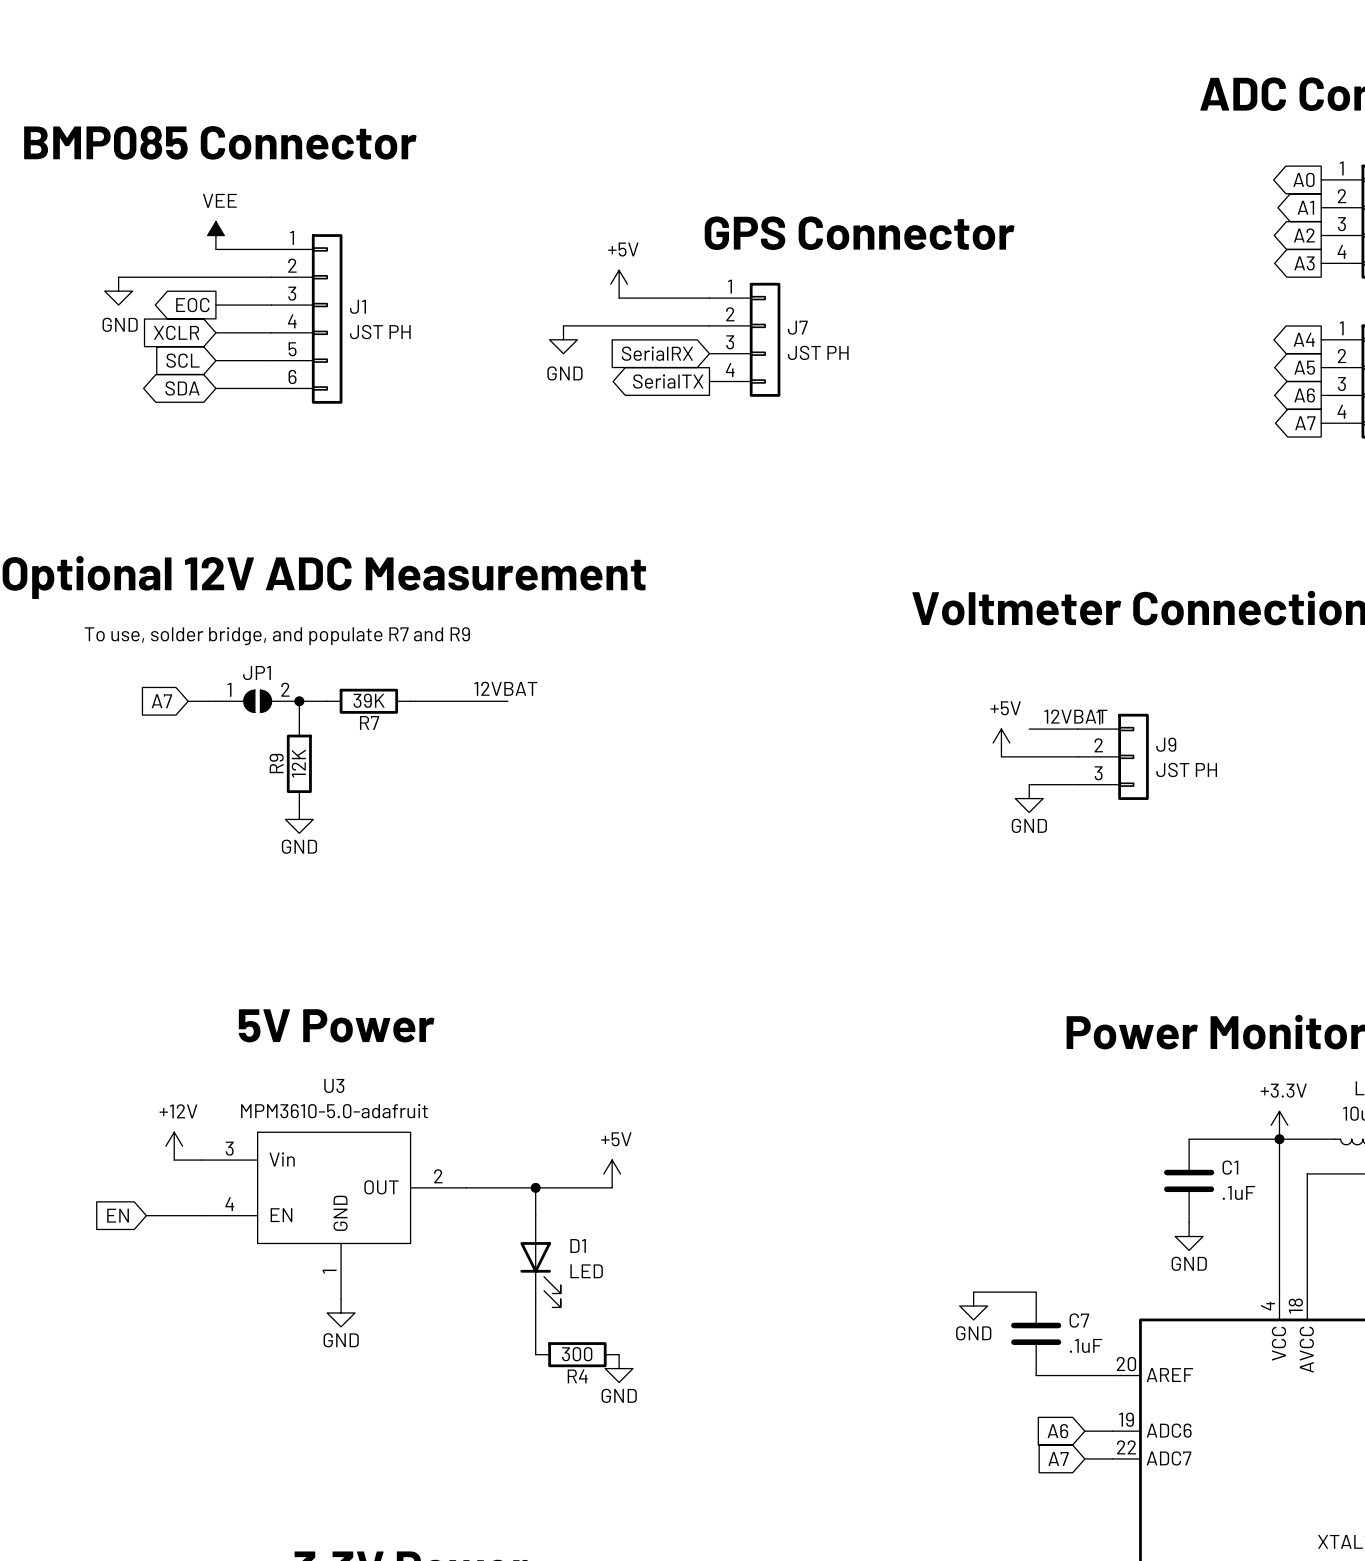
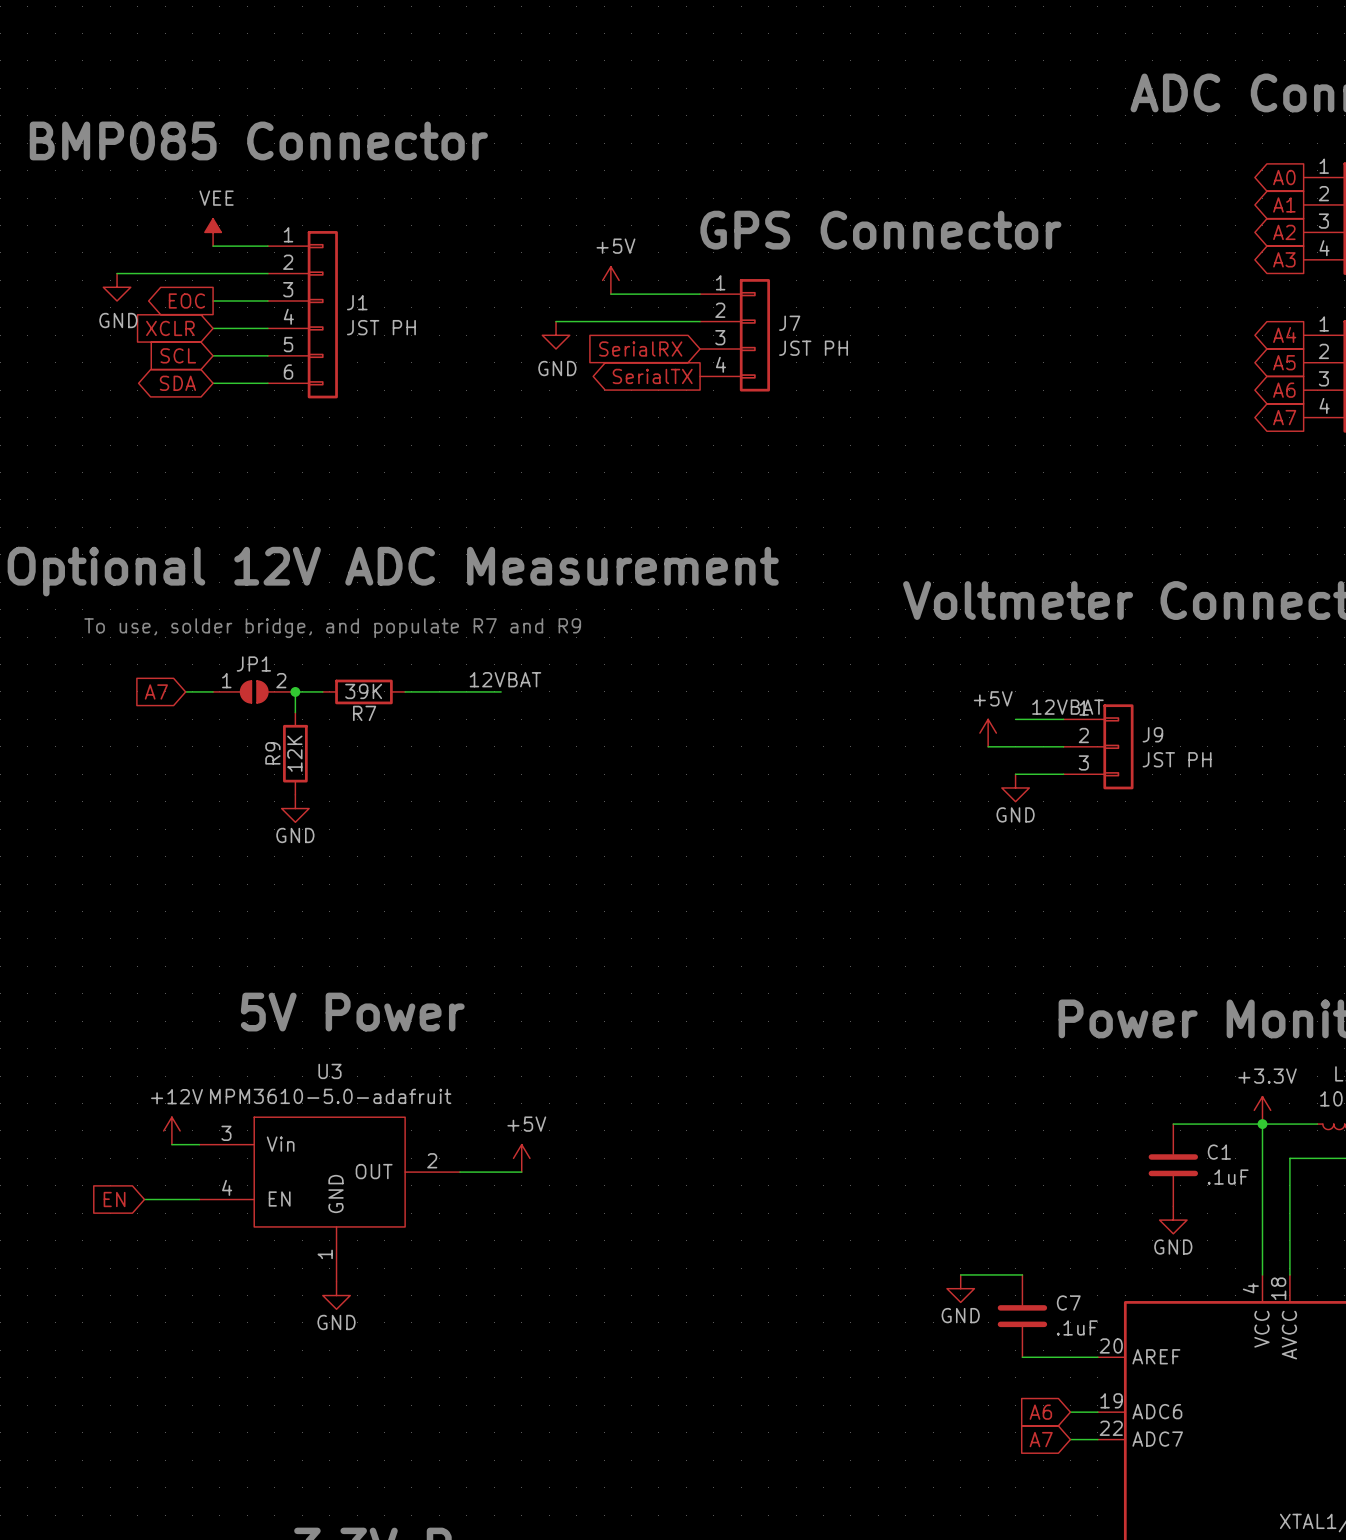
power symbol position: +5V (612, 1173) -> +5V (521, 1158)
wire: (528, 1187) (612, 1187) -> none
wire: (535, 1187) (535, 1215) -> none
junction: (535, 1187) -> none
D1: LED (540, 1261) -> none
wire: (535, 1299) (535, 1354) -> none
R4: 300 (577, 1354) -> none
power symbol: GND (619, 1368) -> none

